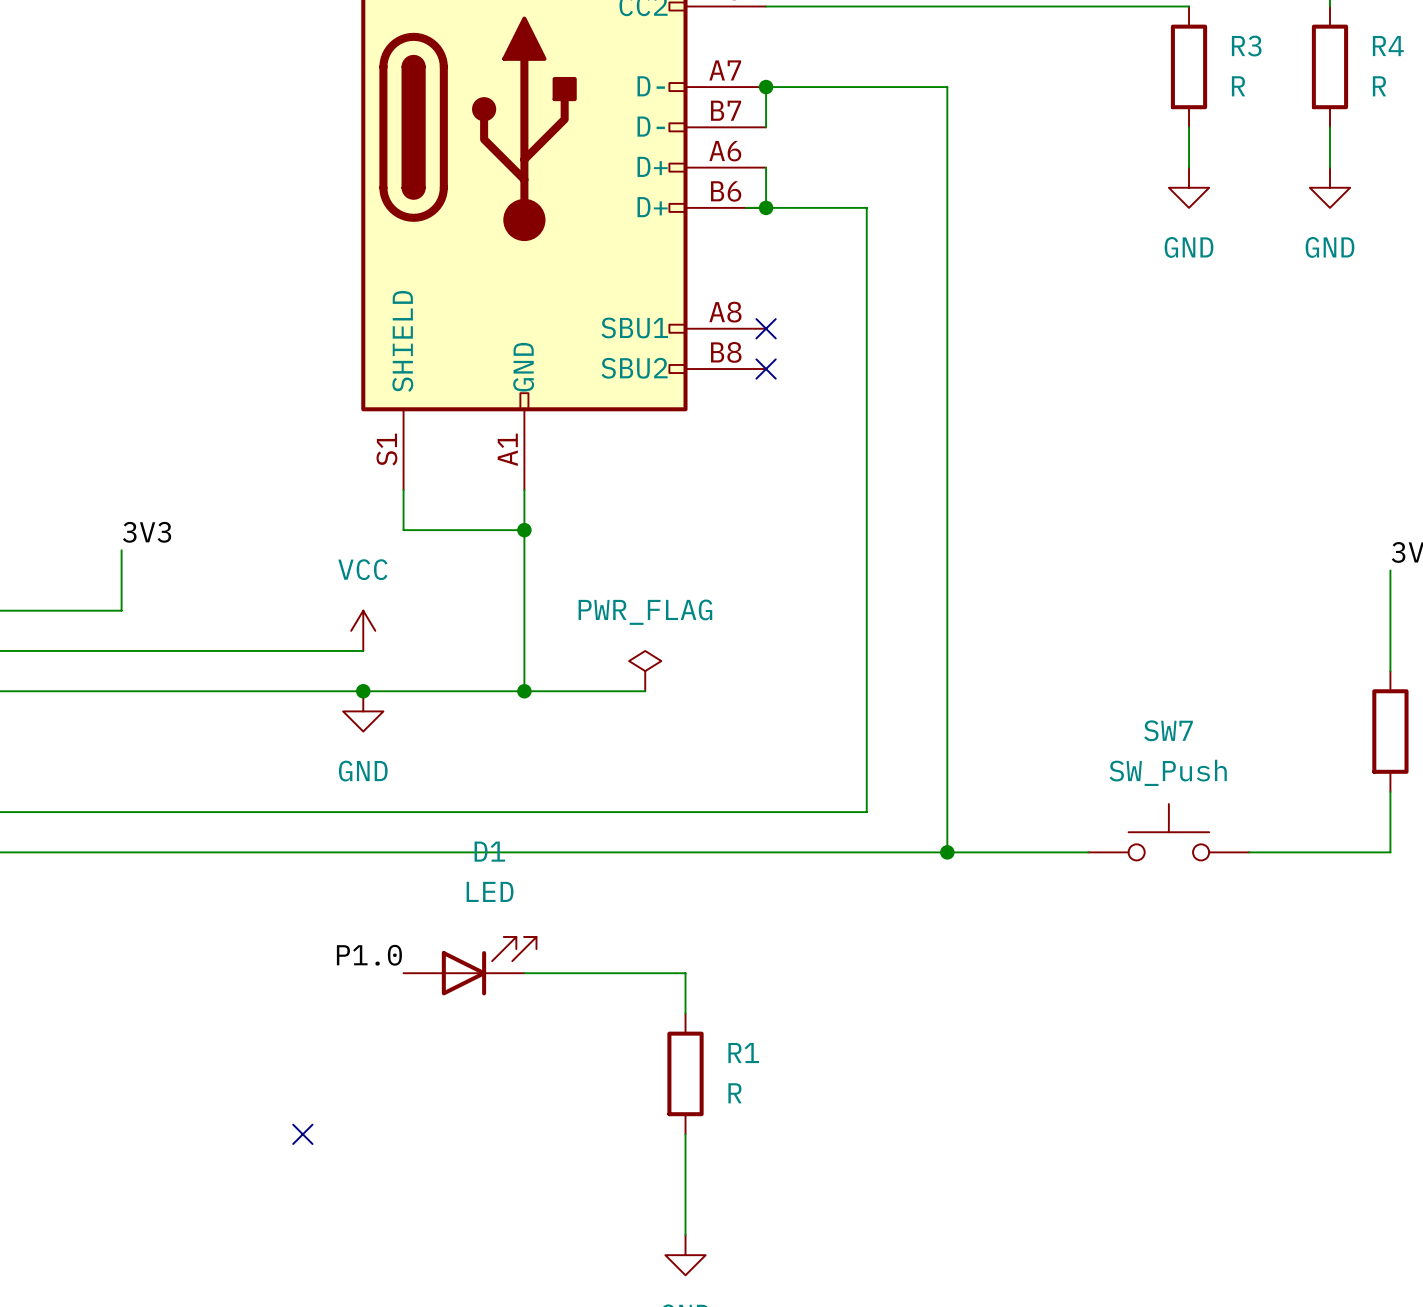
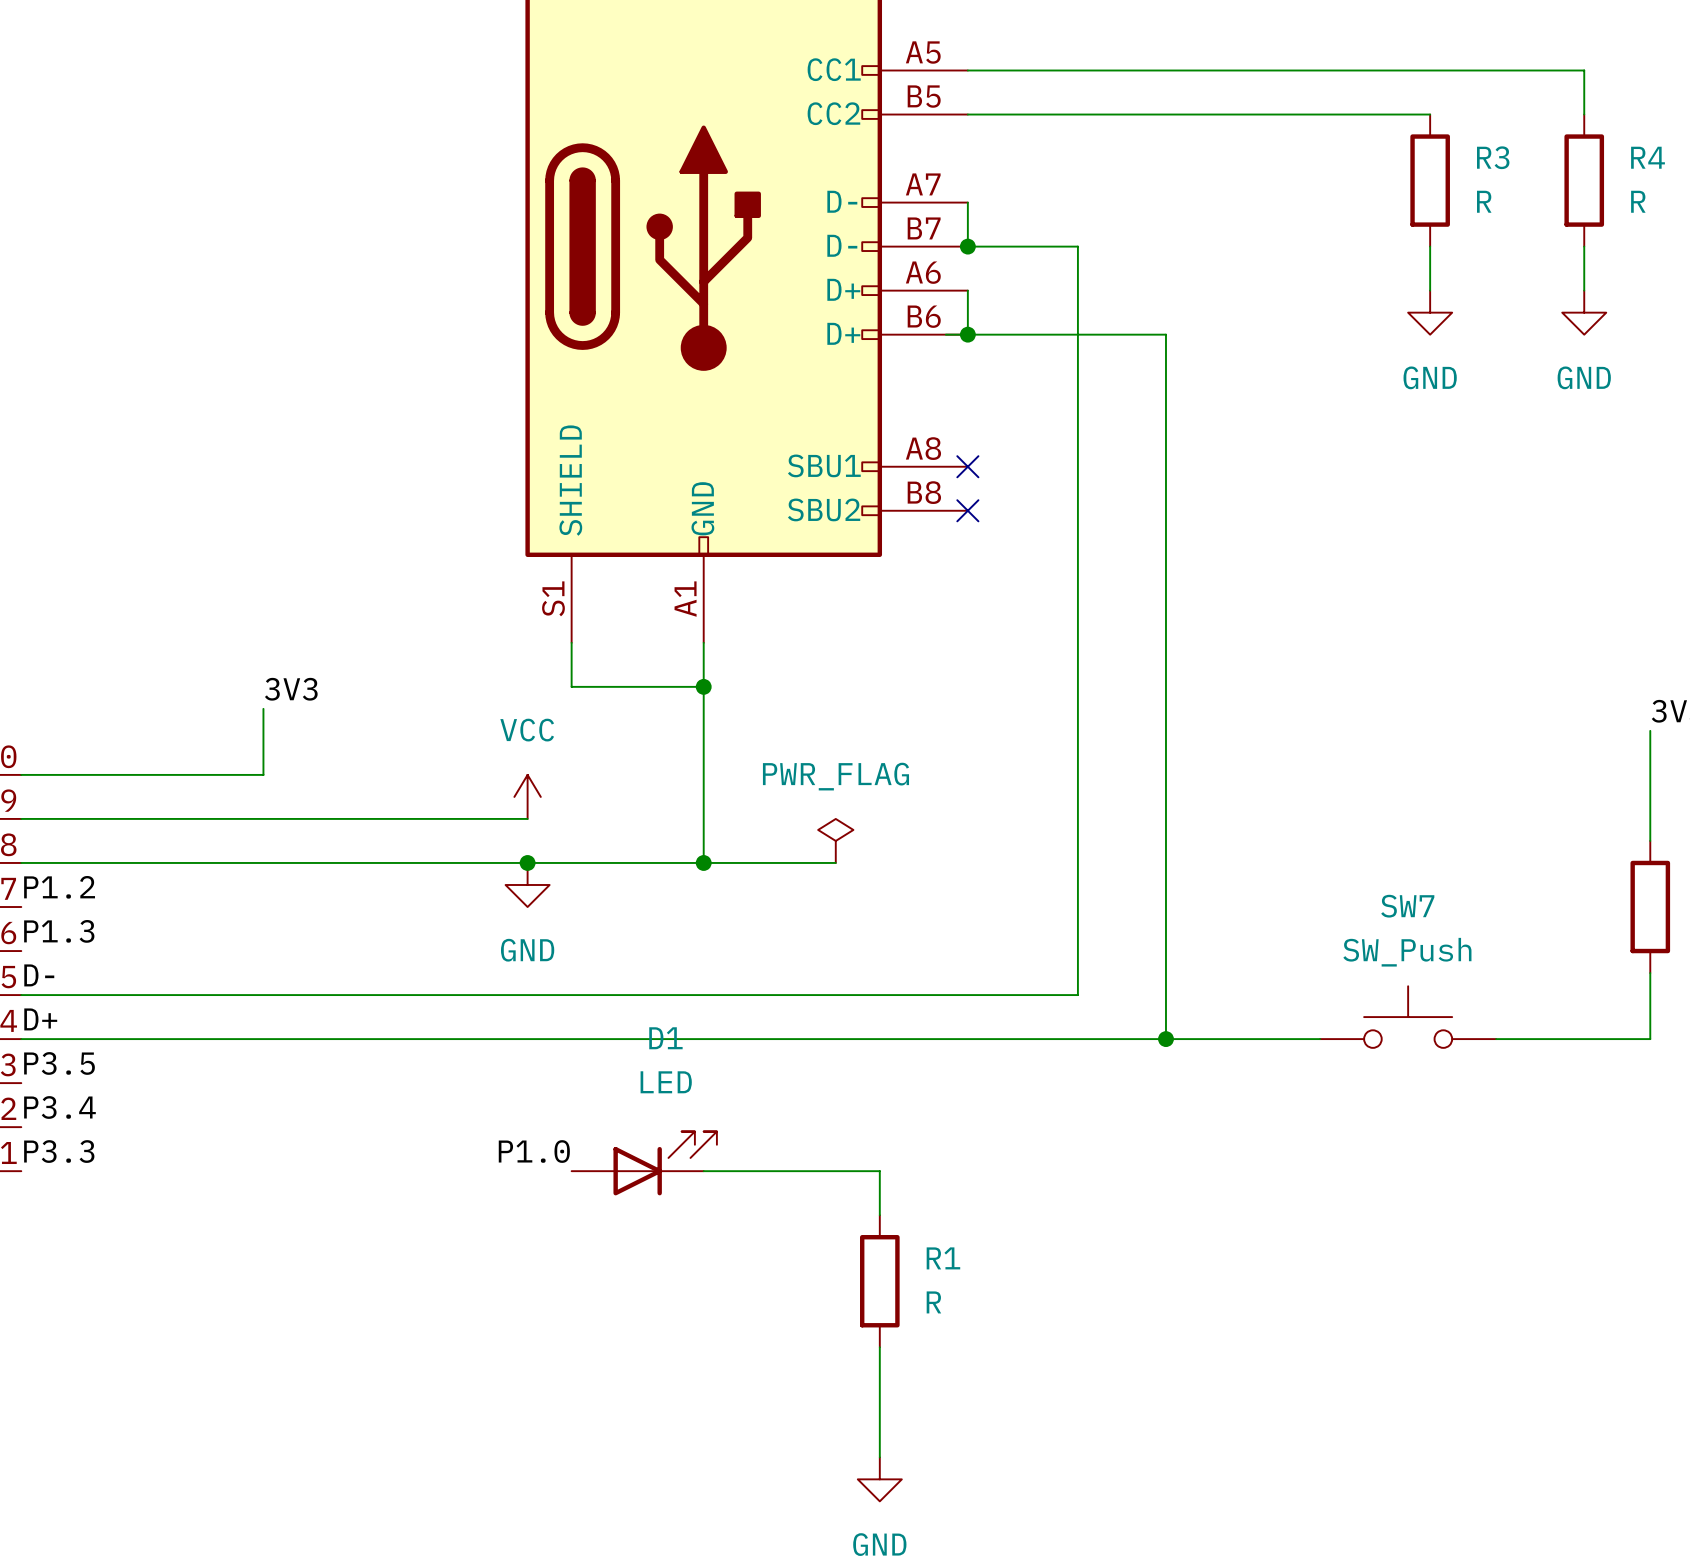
wire: (766, 87) (947, 87) (947, 207) -> (967, 246) (1077, 246) (1077, 334) (1165, 334)
junction position: (766, 87) -> (967, 246)
no-connect mark: (302, 1134) -> none

